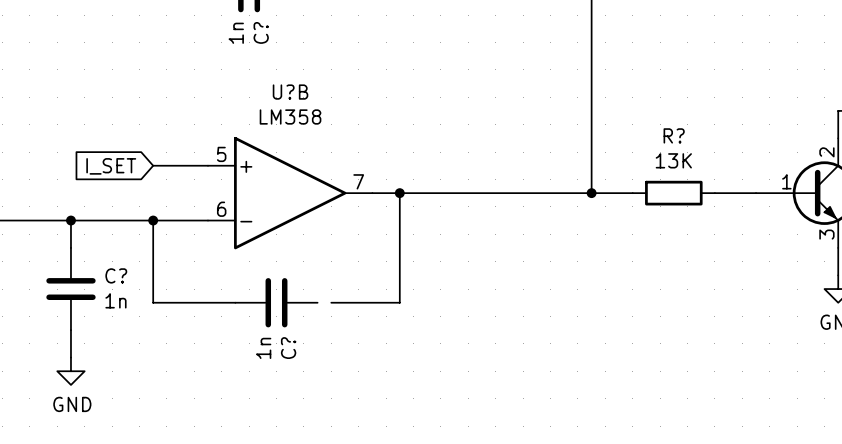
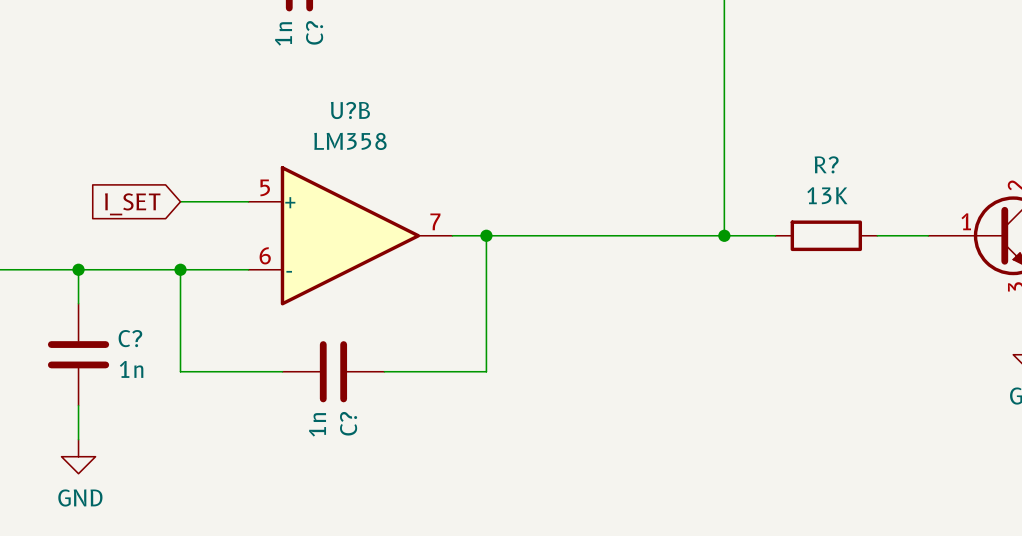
wire: none -> (384, 371) (401, 371)

